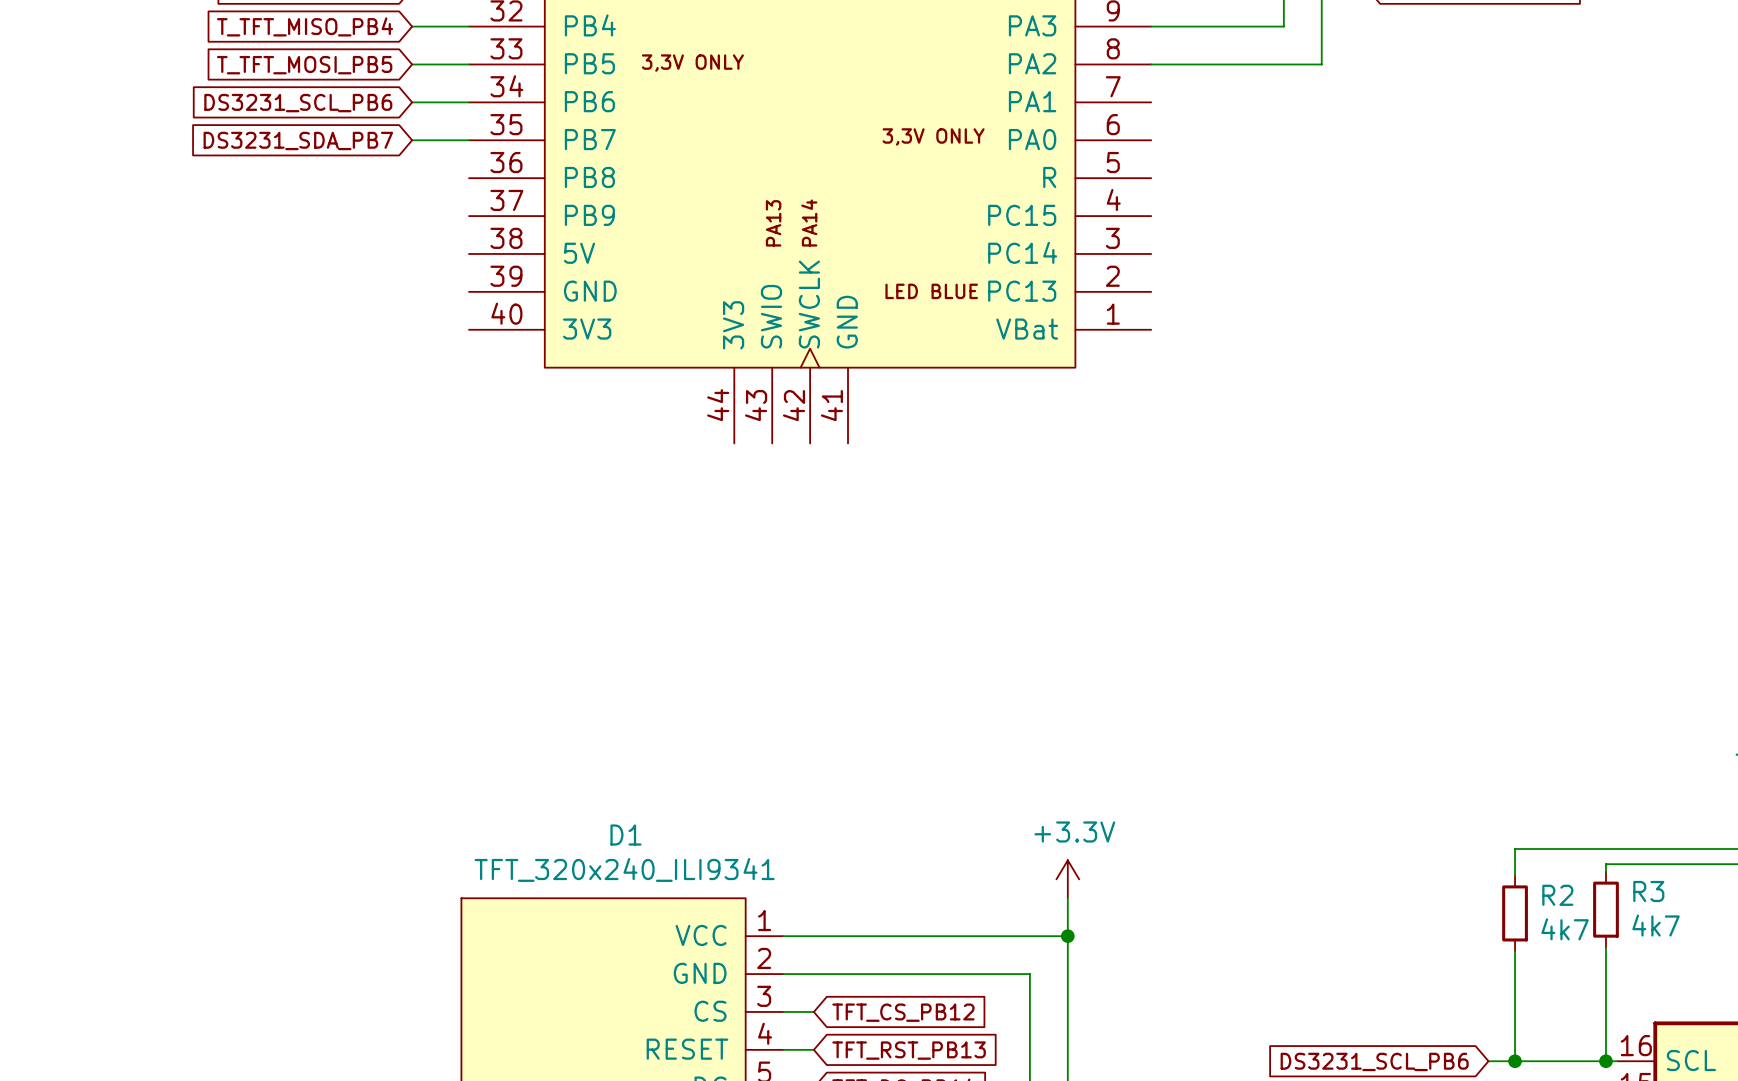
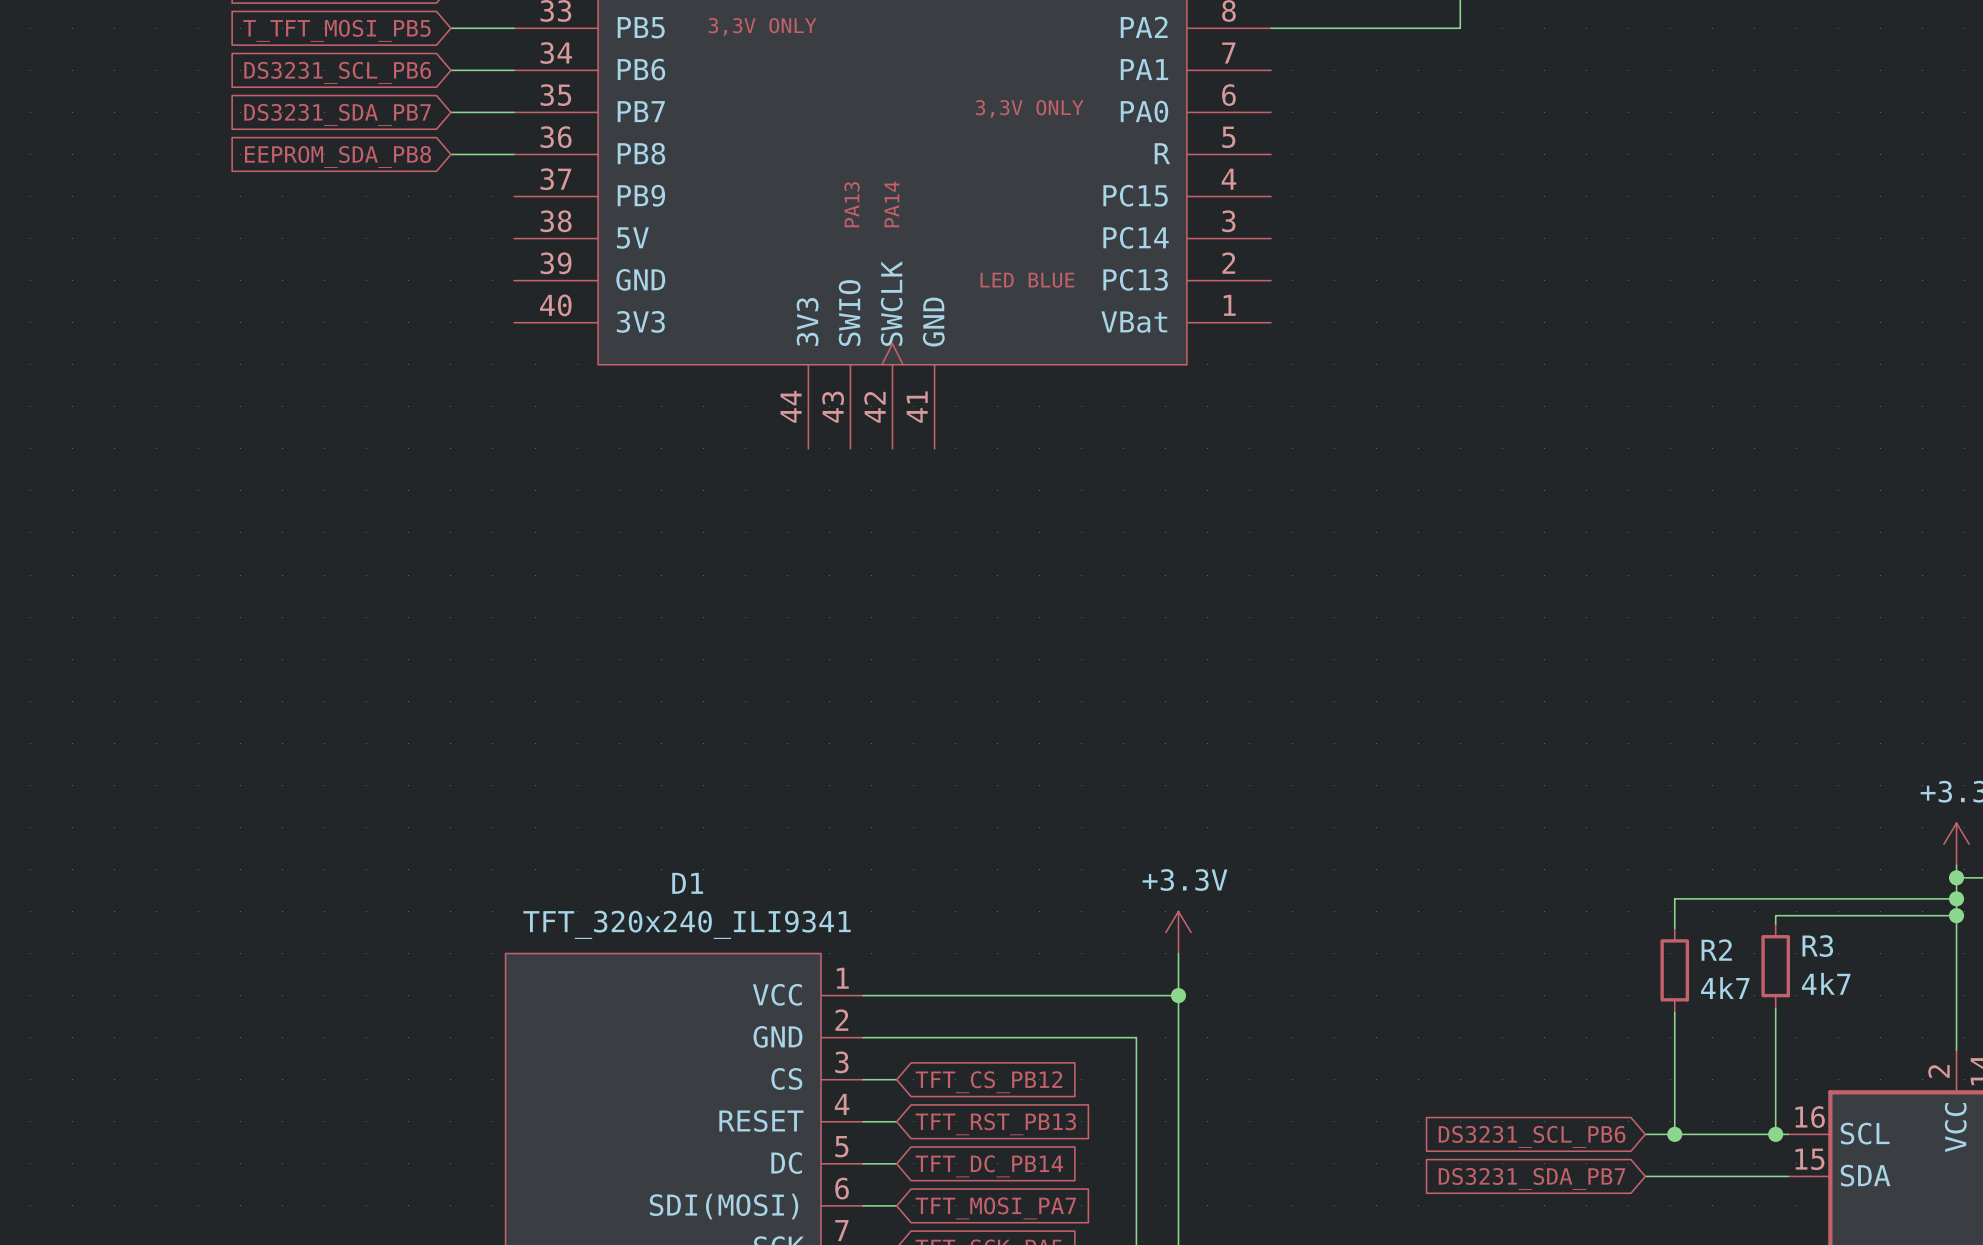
global label: none -> EEPROM_SDA_PB8 (338, 156)
wire: none -> (450, 154) (513, 154)

